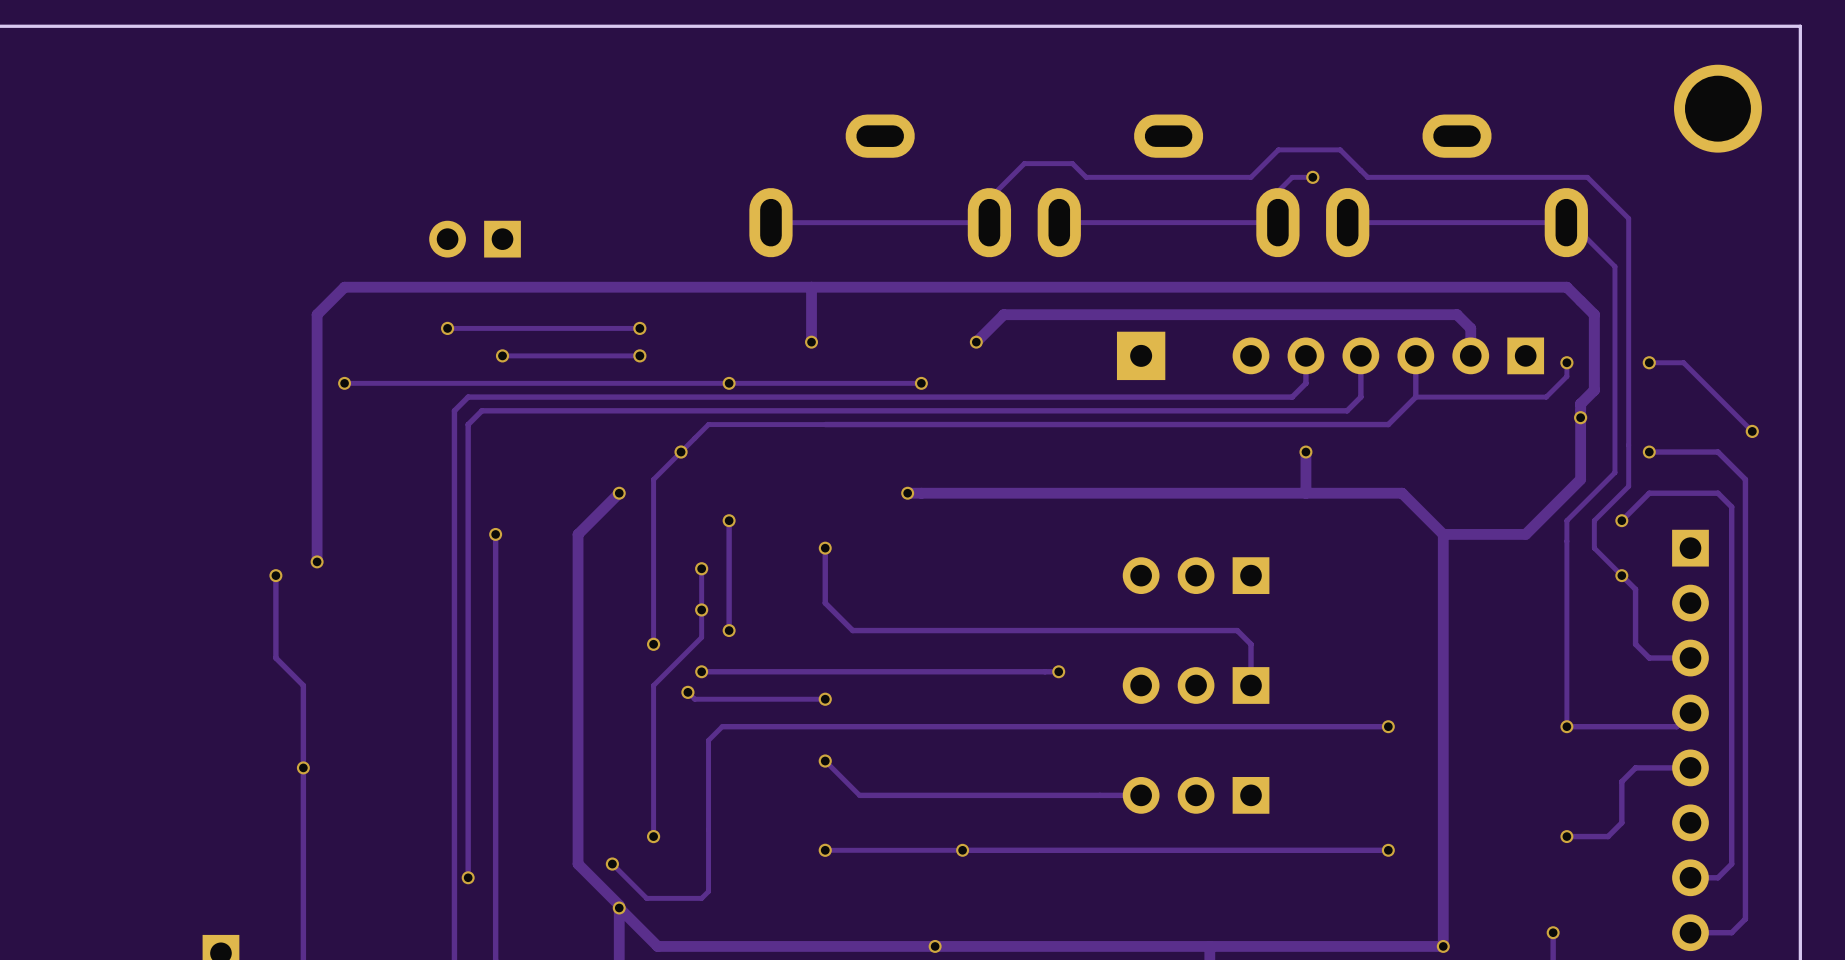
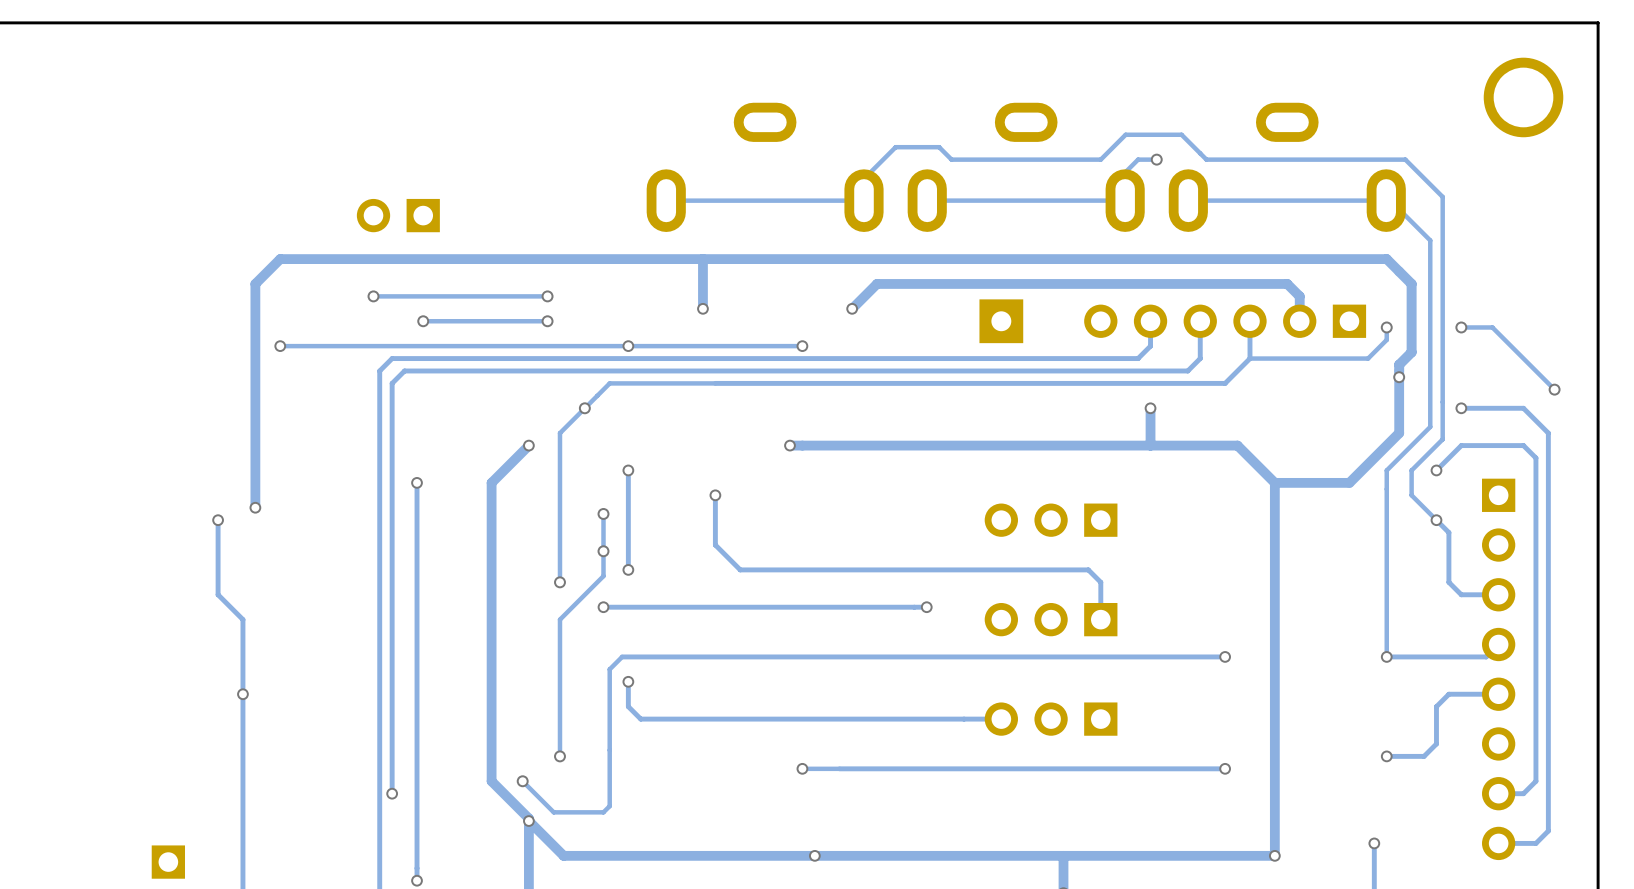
track: (687, 692) (694, 699) (825, 699) -> none
via: (687, 692) -> none
via: (825, 699) -> none
via: none -> (628, 681)
track: (825, 761) (859, 795) -> (628, 681) (628, 706) (640, 719) (746, 719)
via: (825, 761) -> none
via: (825, 850) -> none
track: (921, 850) (825, 850) -> none
via position: (962, 850) -> (802, 768)

